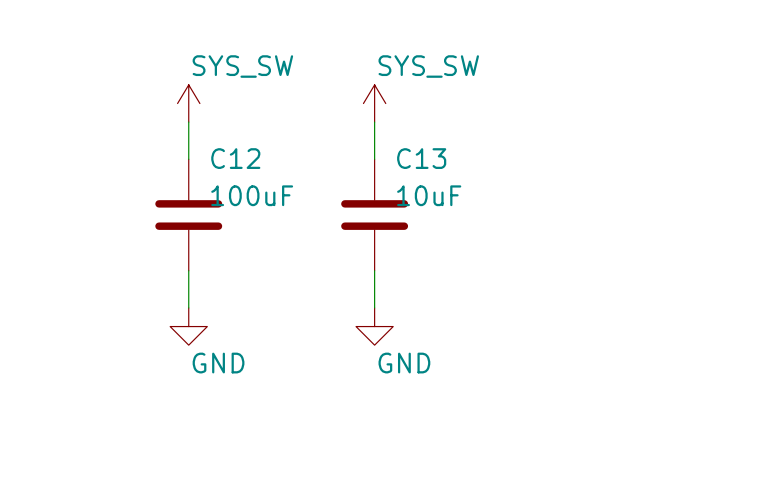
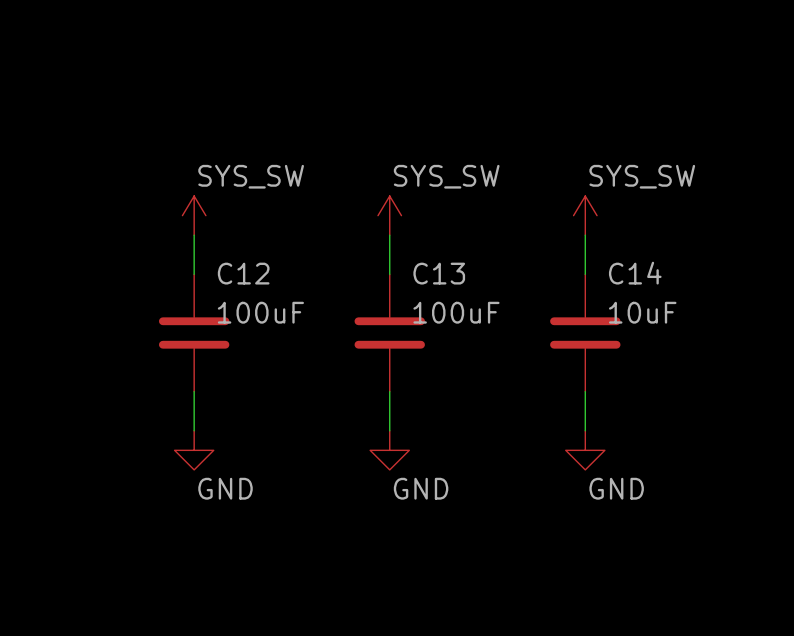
power symbol: none -> SYS_SW (585, 215)
wire: none -> (585, 235) (585, 274)
C13 value: 10uF (429, 195) -> 100uF (456, 312)
C14: none -> 10uF (585, 332)
wire: none -> (585, 391) (585, 430)
power symbol: none -> GND (585, 450)

